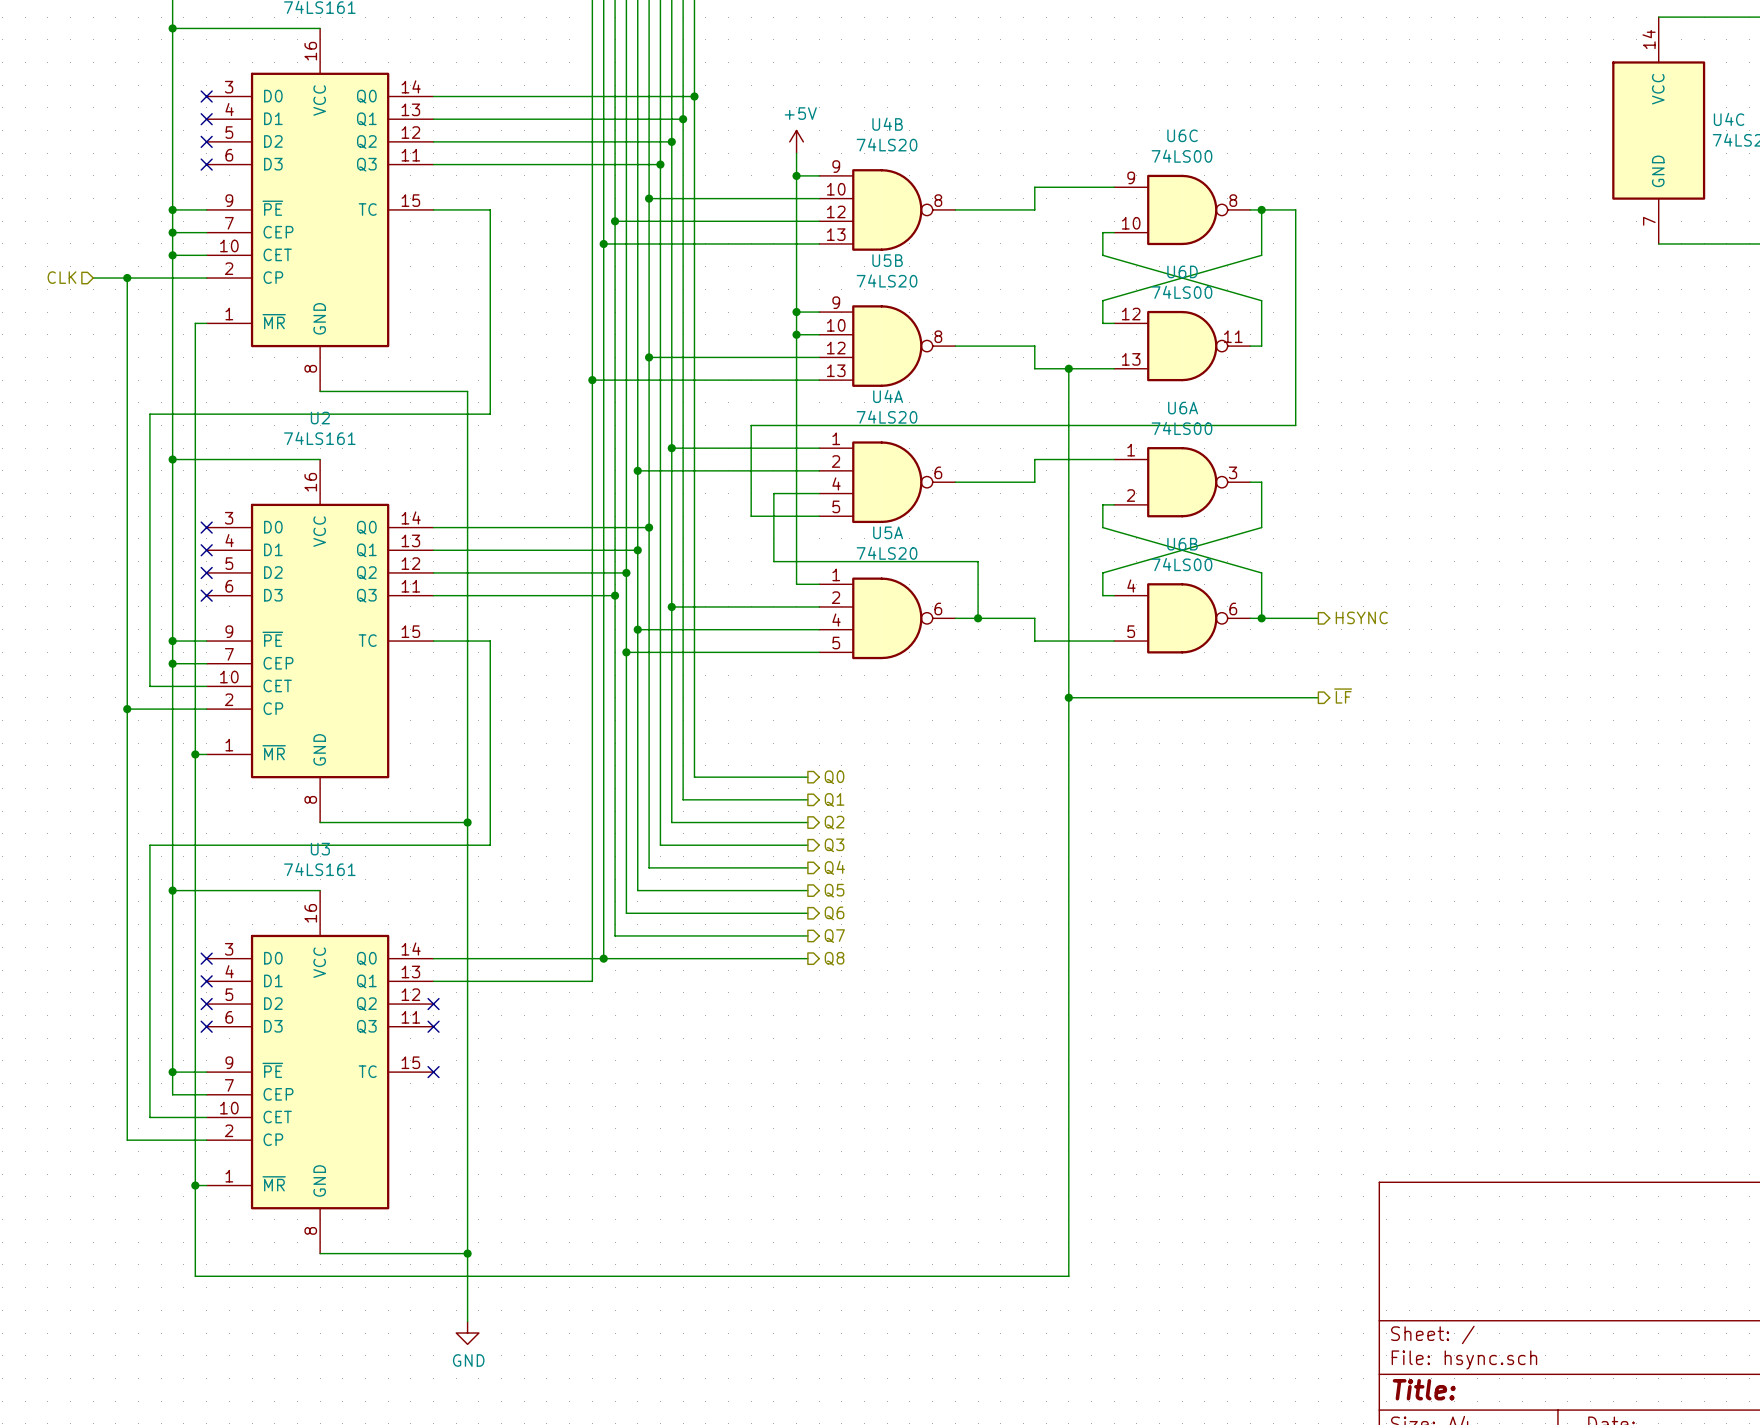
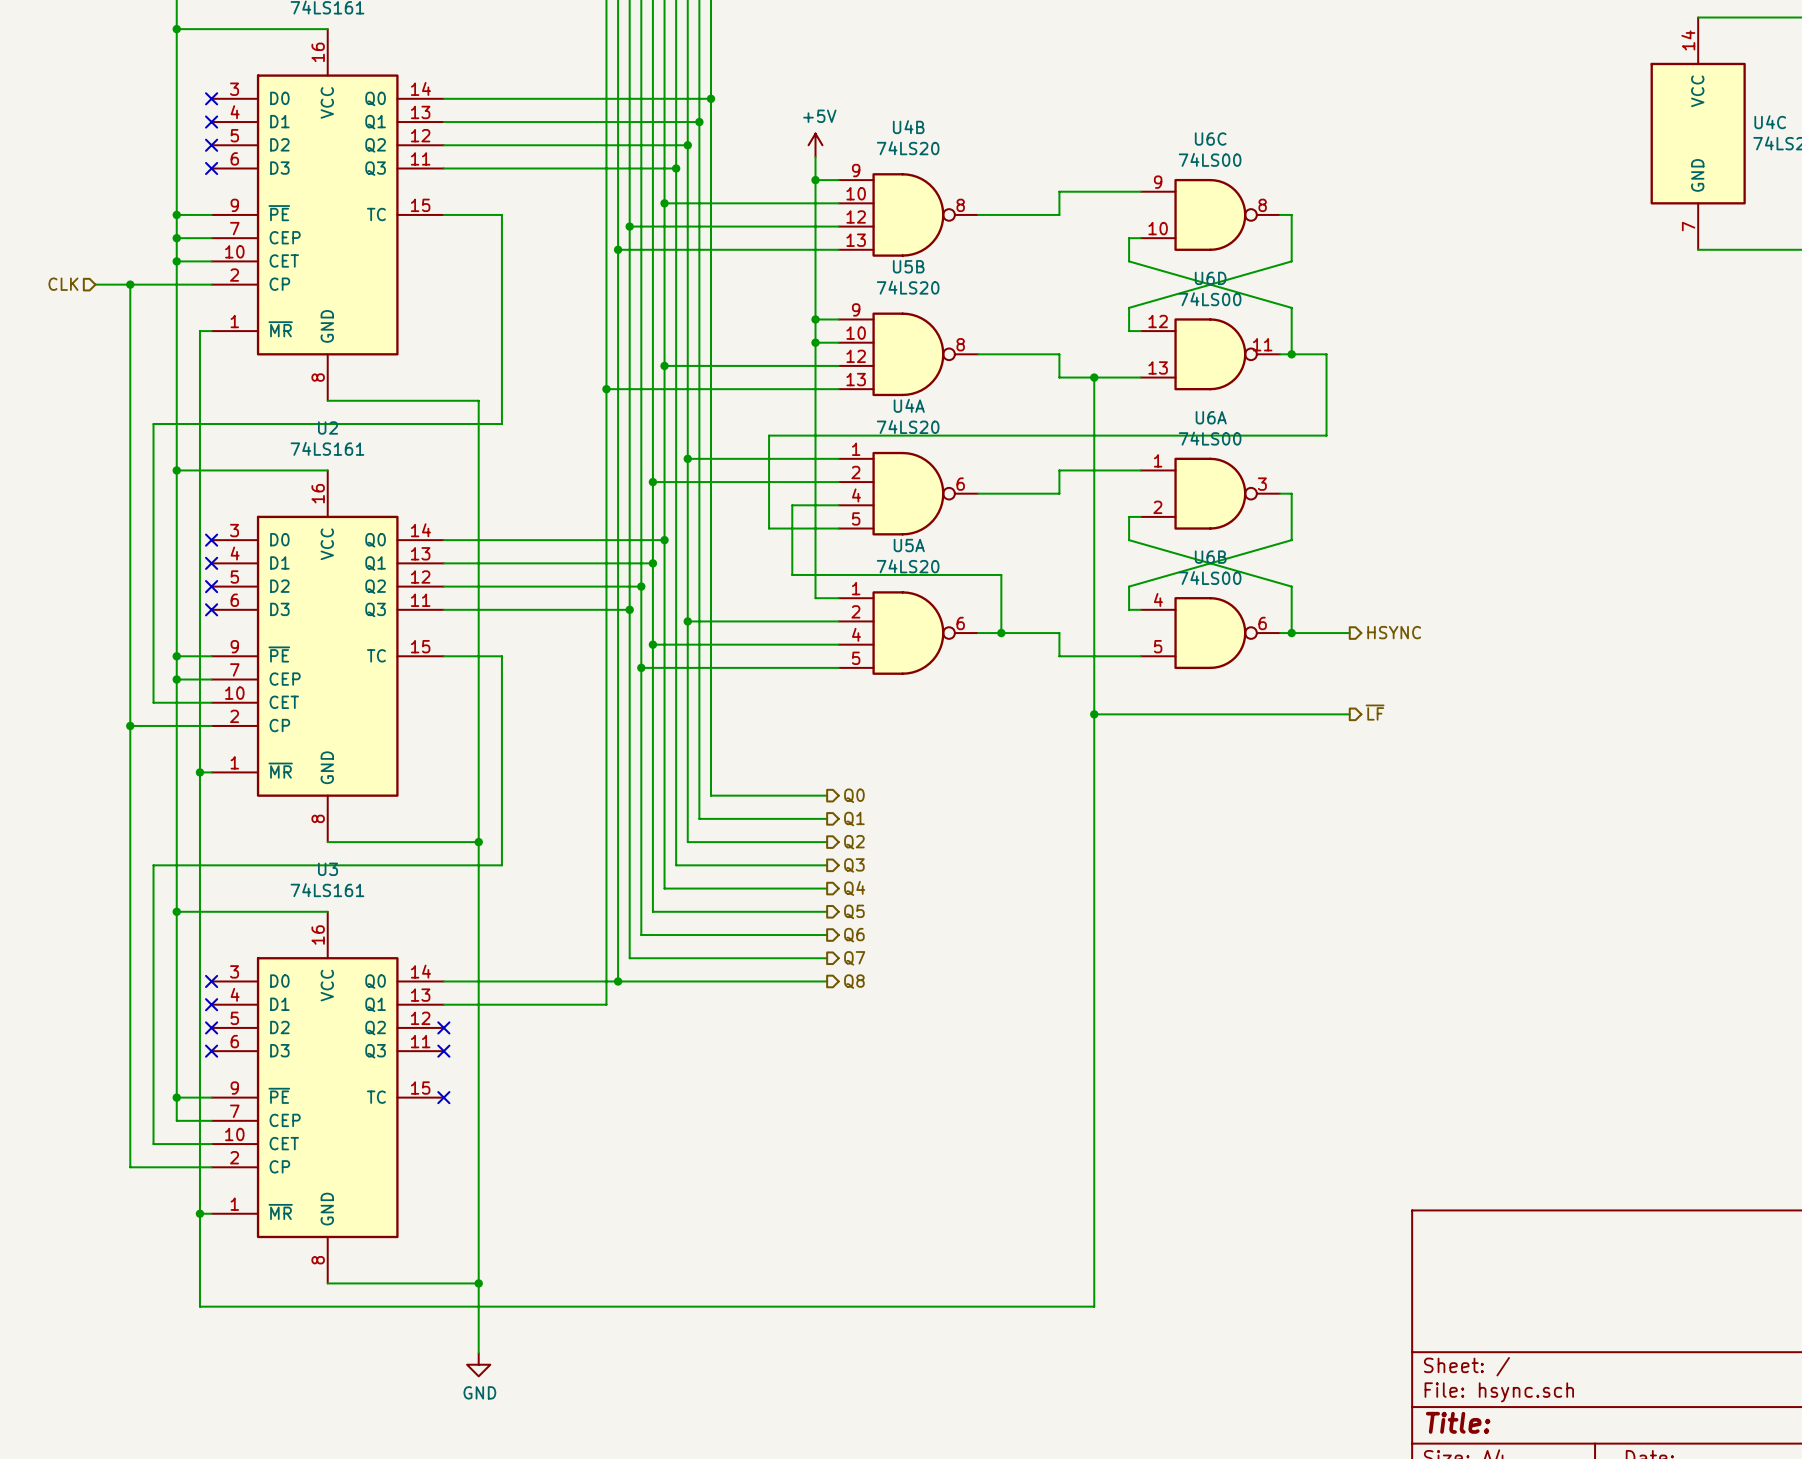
wire: (1261, 209) (1295, 209) (1295, 346) -> (1291, 354) (1326, 354)
junction: (1261, 209) -> none
junction: none -> (1291, 354)

